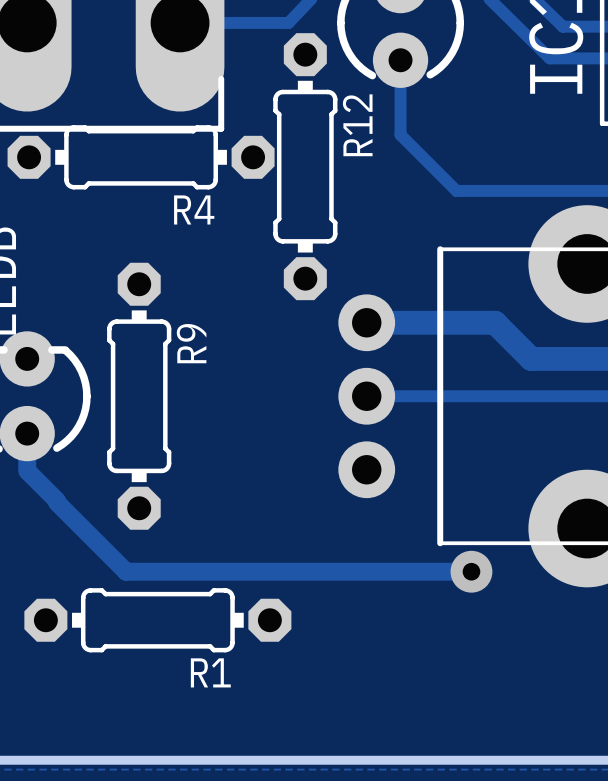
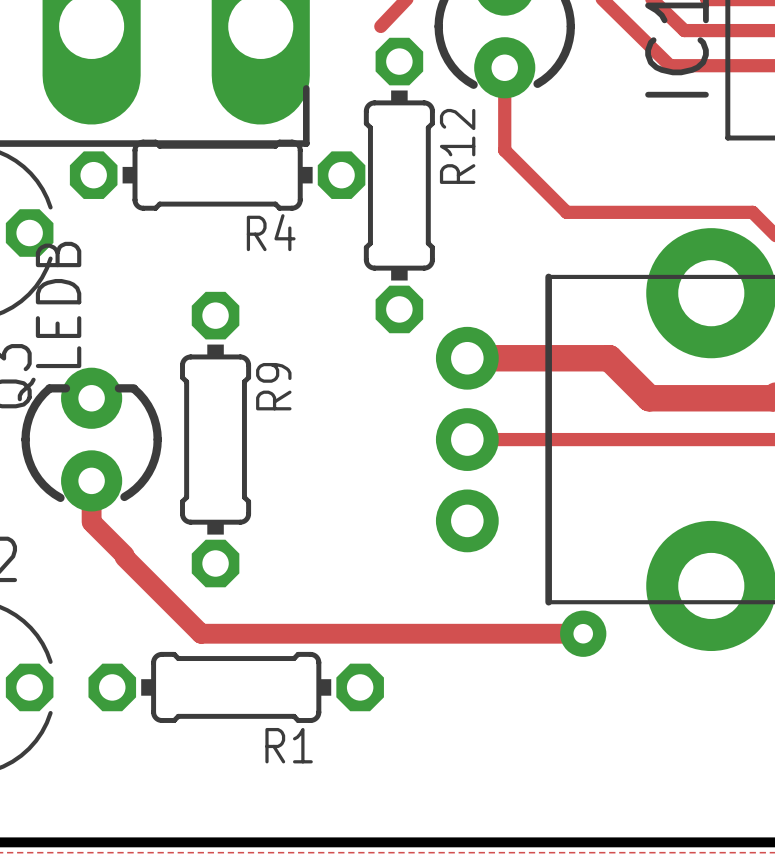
track: (180, 22) (288, 22) -> none

